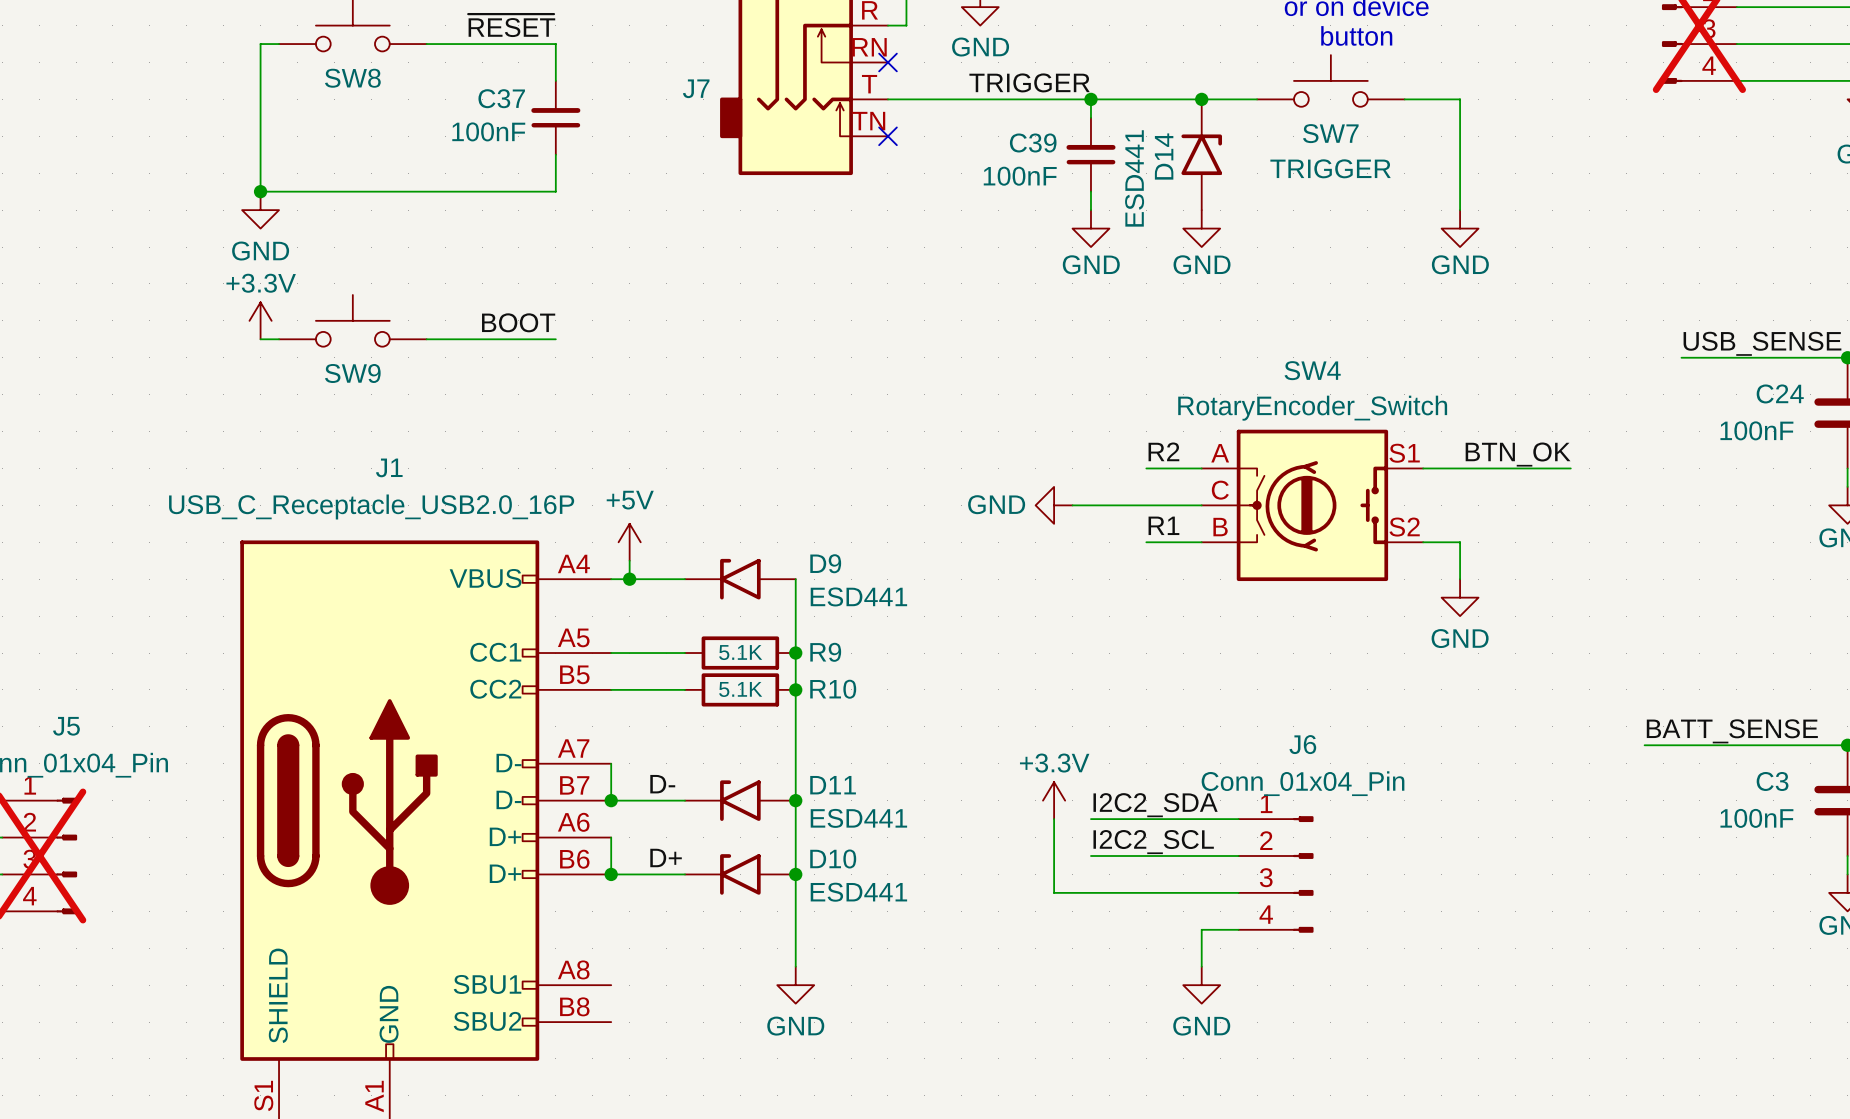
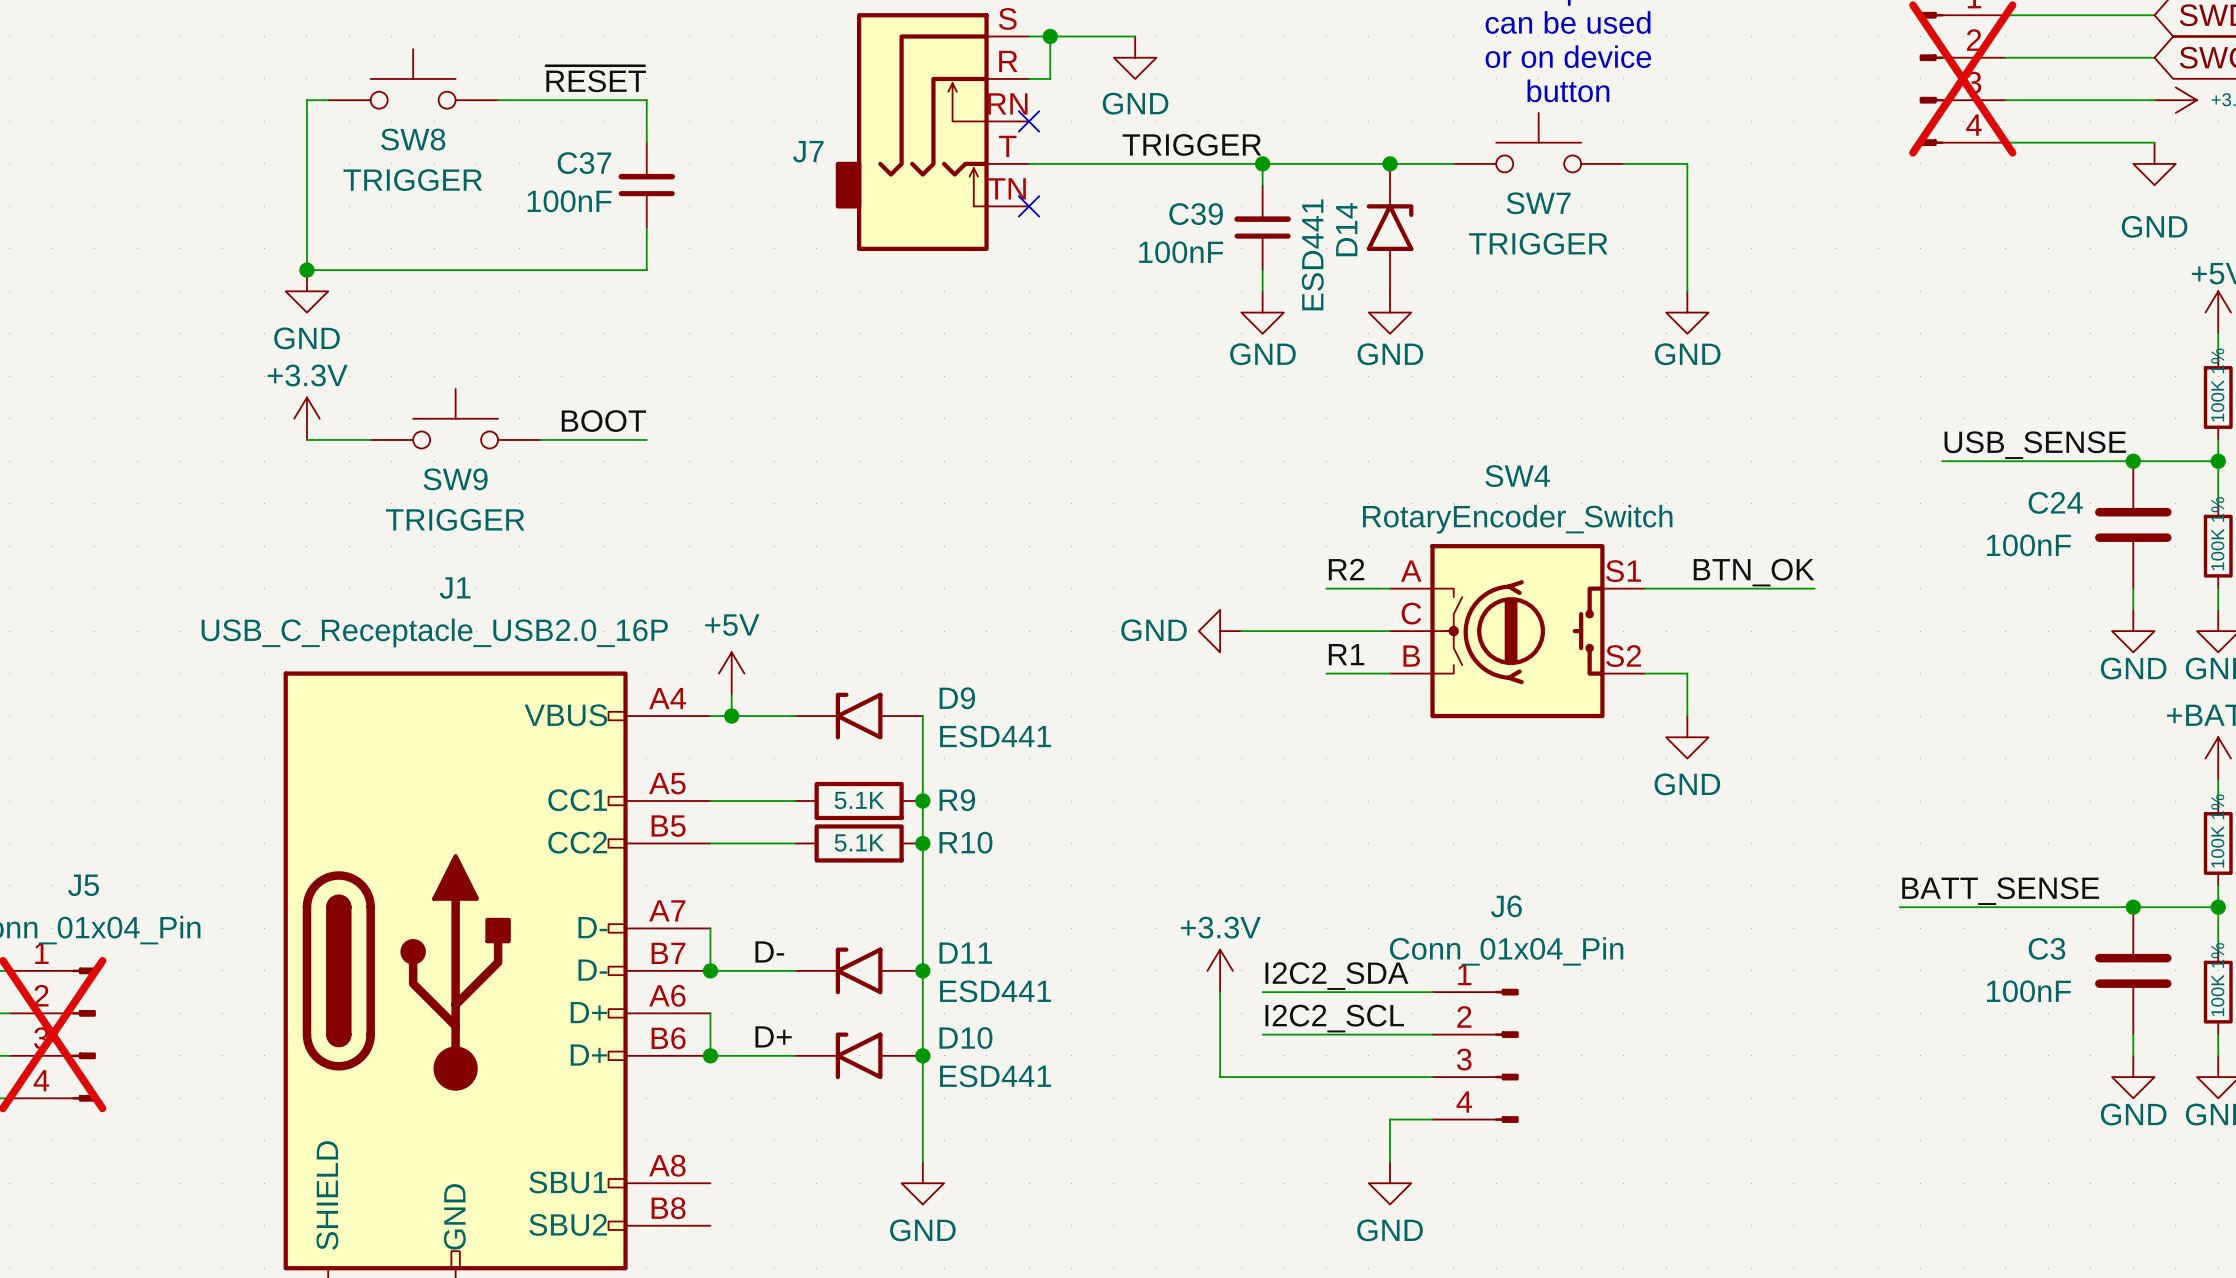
SW8 value: none -> TRIGGER (412, 180)
SW9 position: (352, 320) -> (455, 418)
SW9 value: none -> TRIGGER (455, 519)

